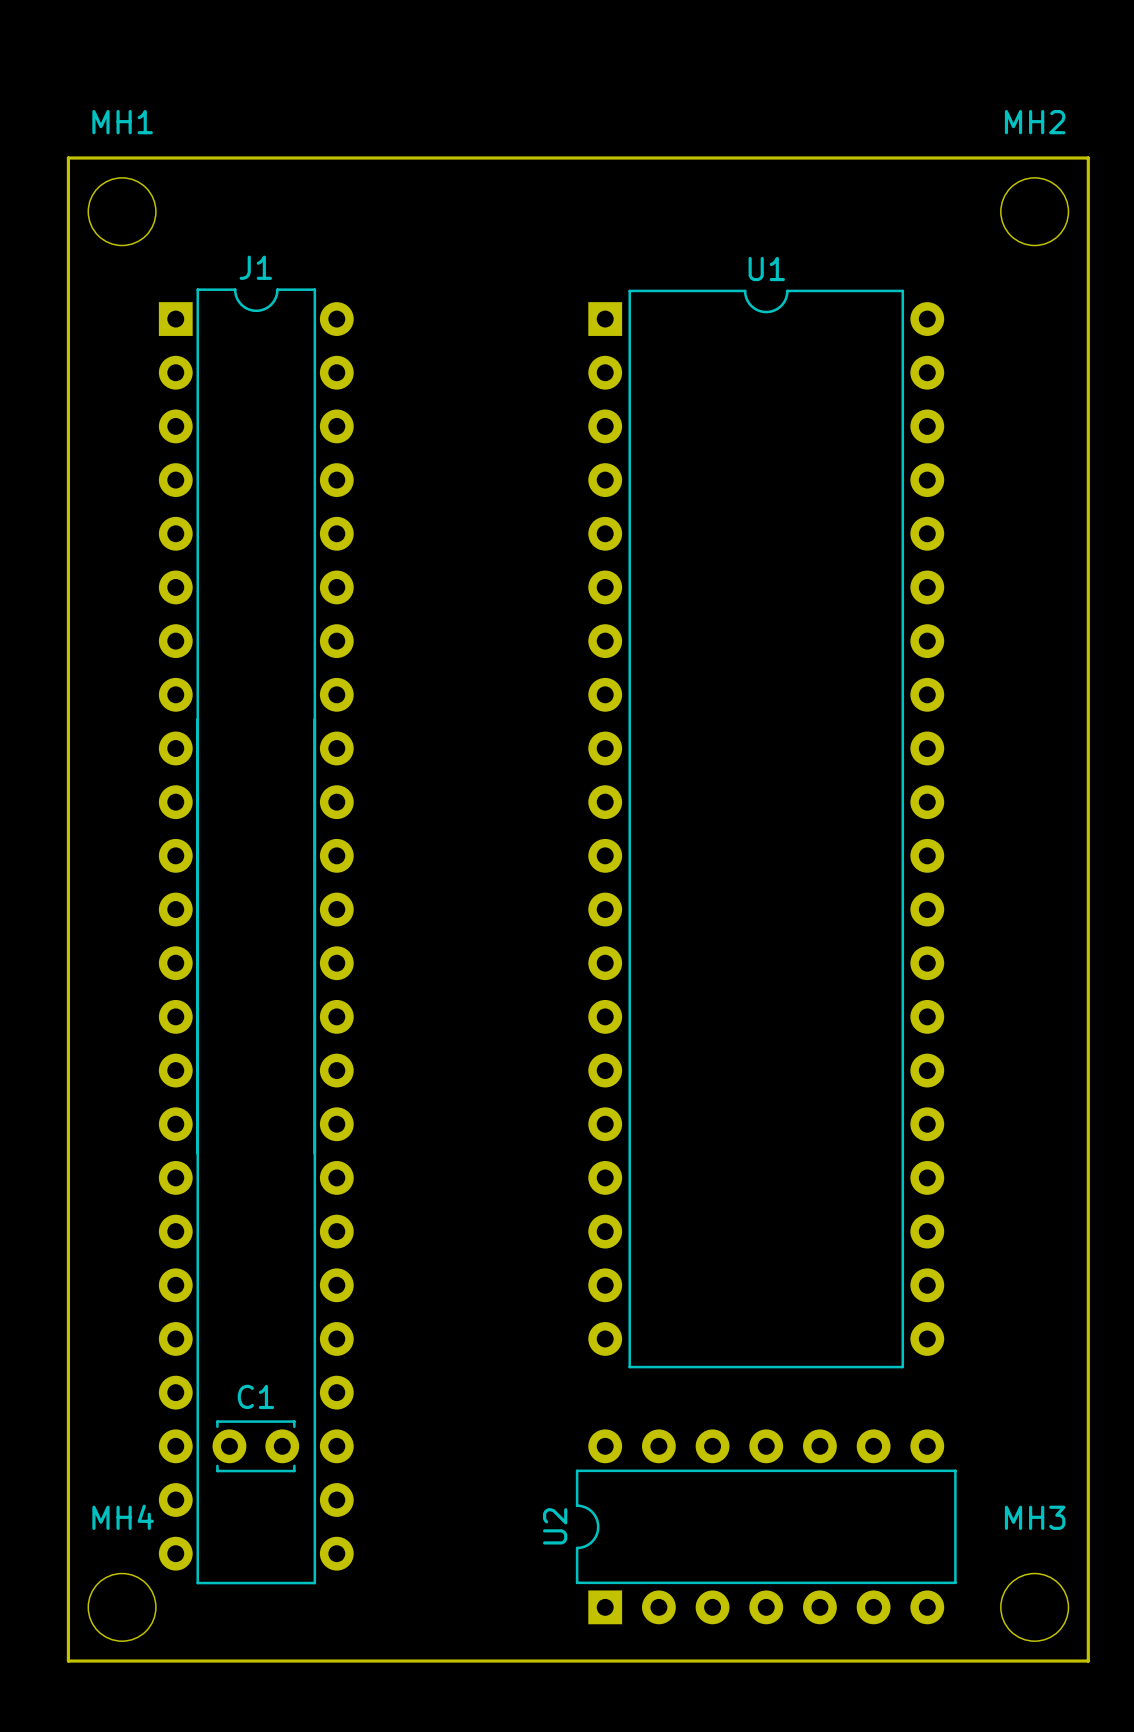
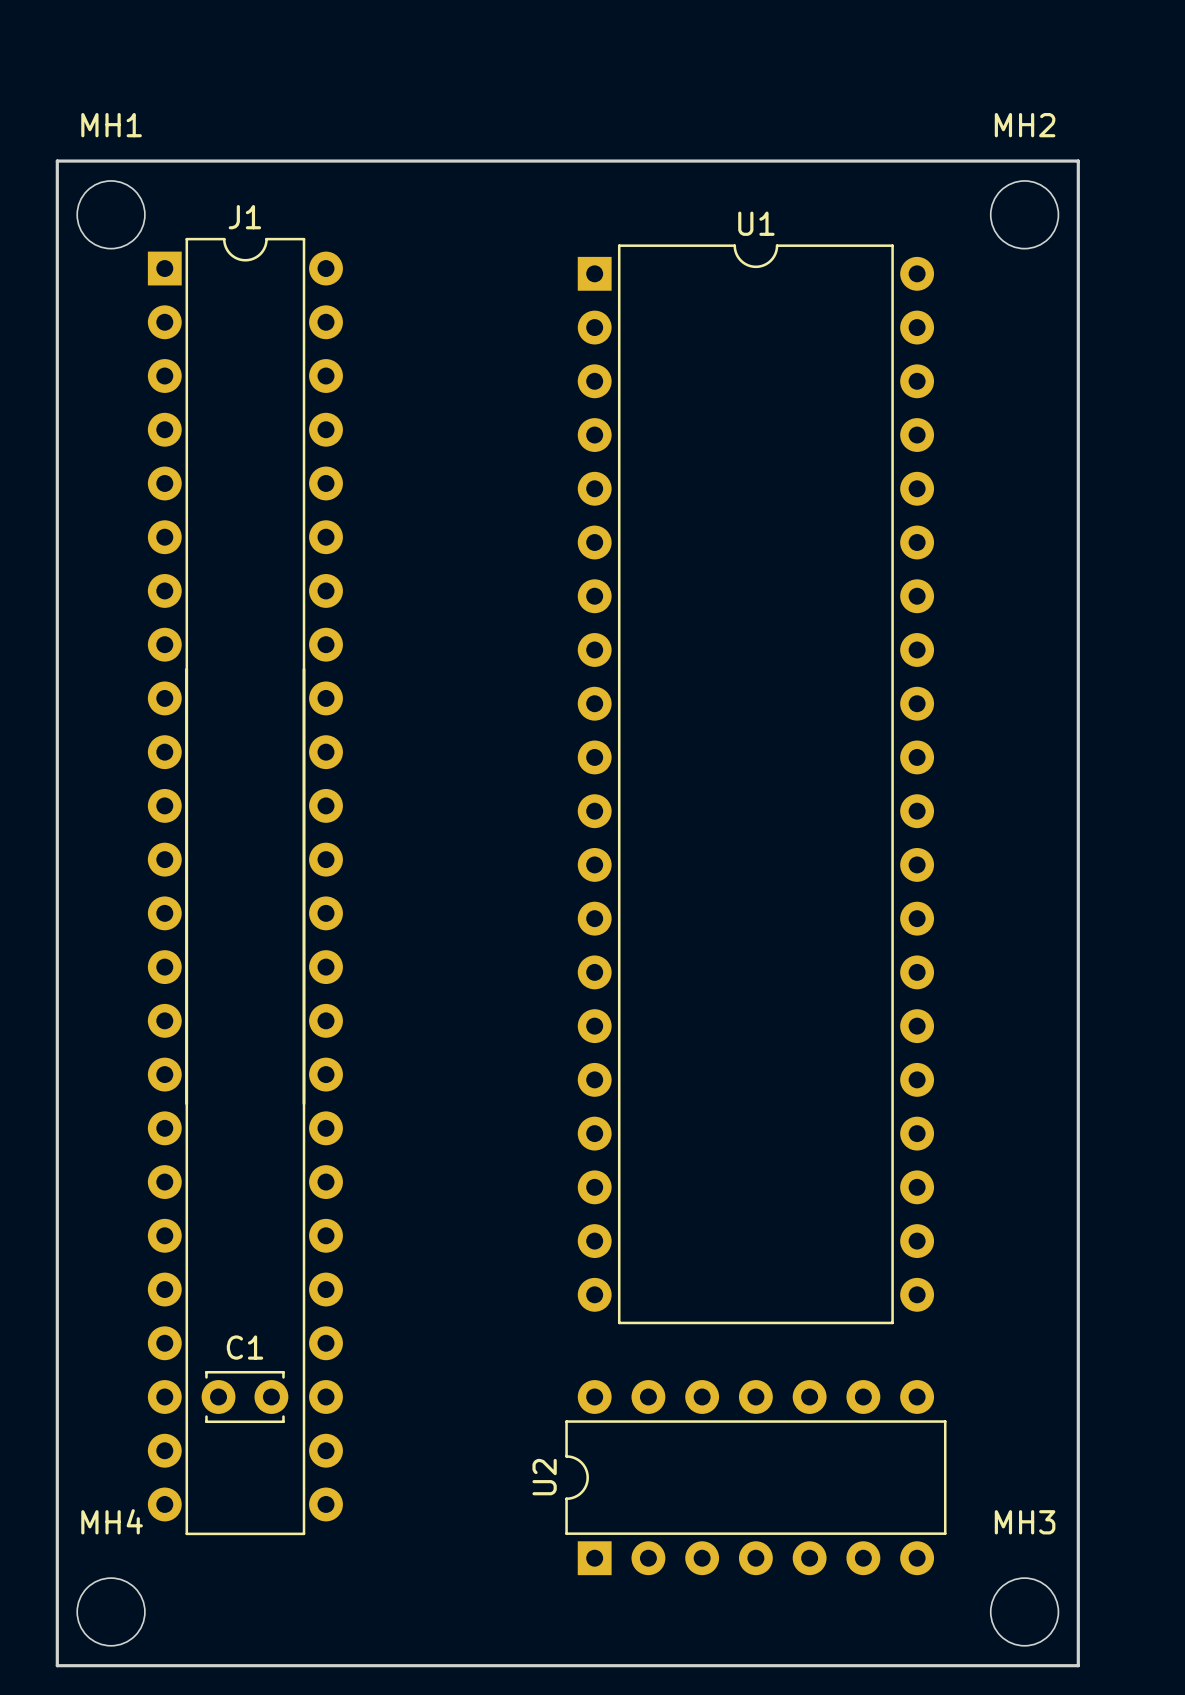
U1 position: (766, 829) -> (755, 784)
J1 position: (256, 936) -> (245, 886)
C1 position: (255, 1446) -> (244, 1397)
U2 position: (766, 1526) -> (755, 1477)

